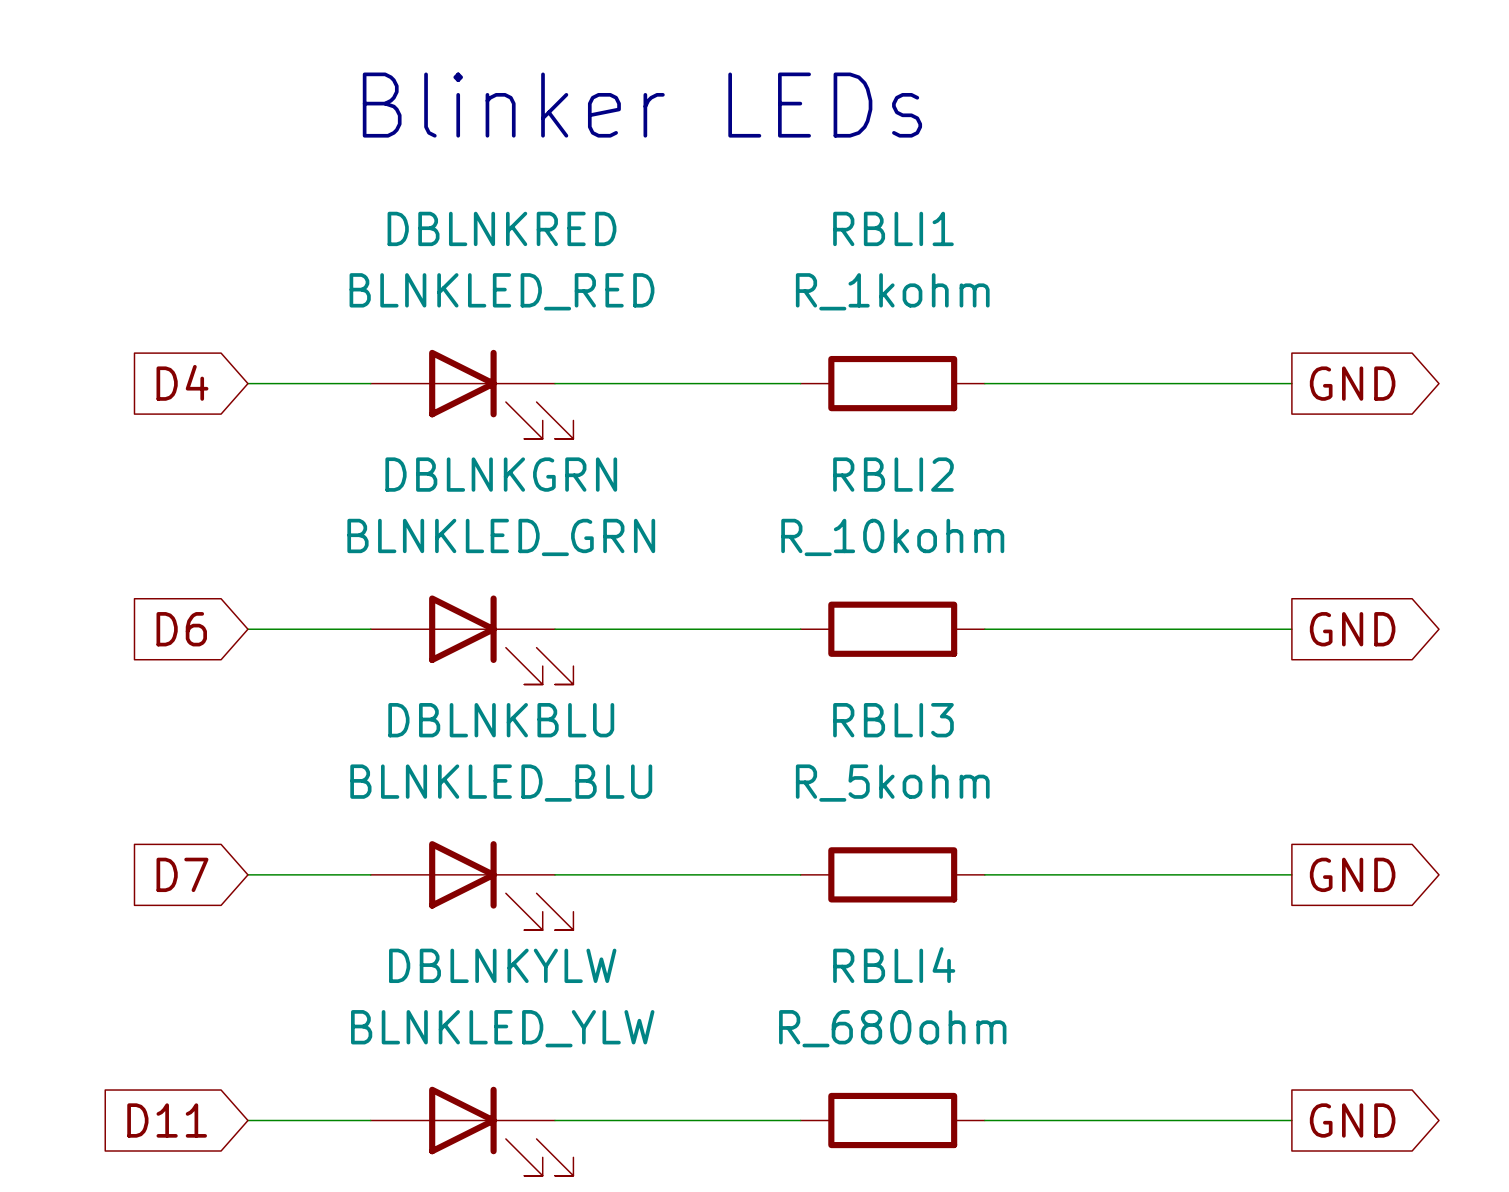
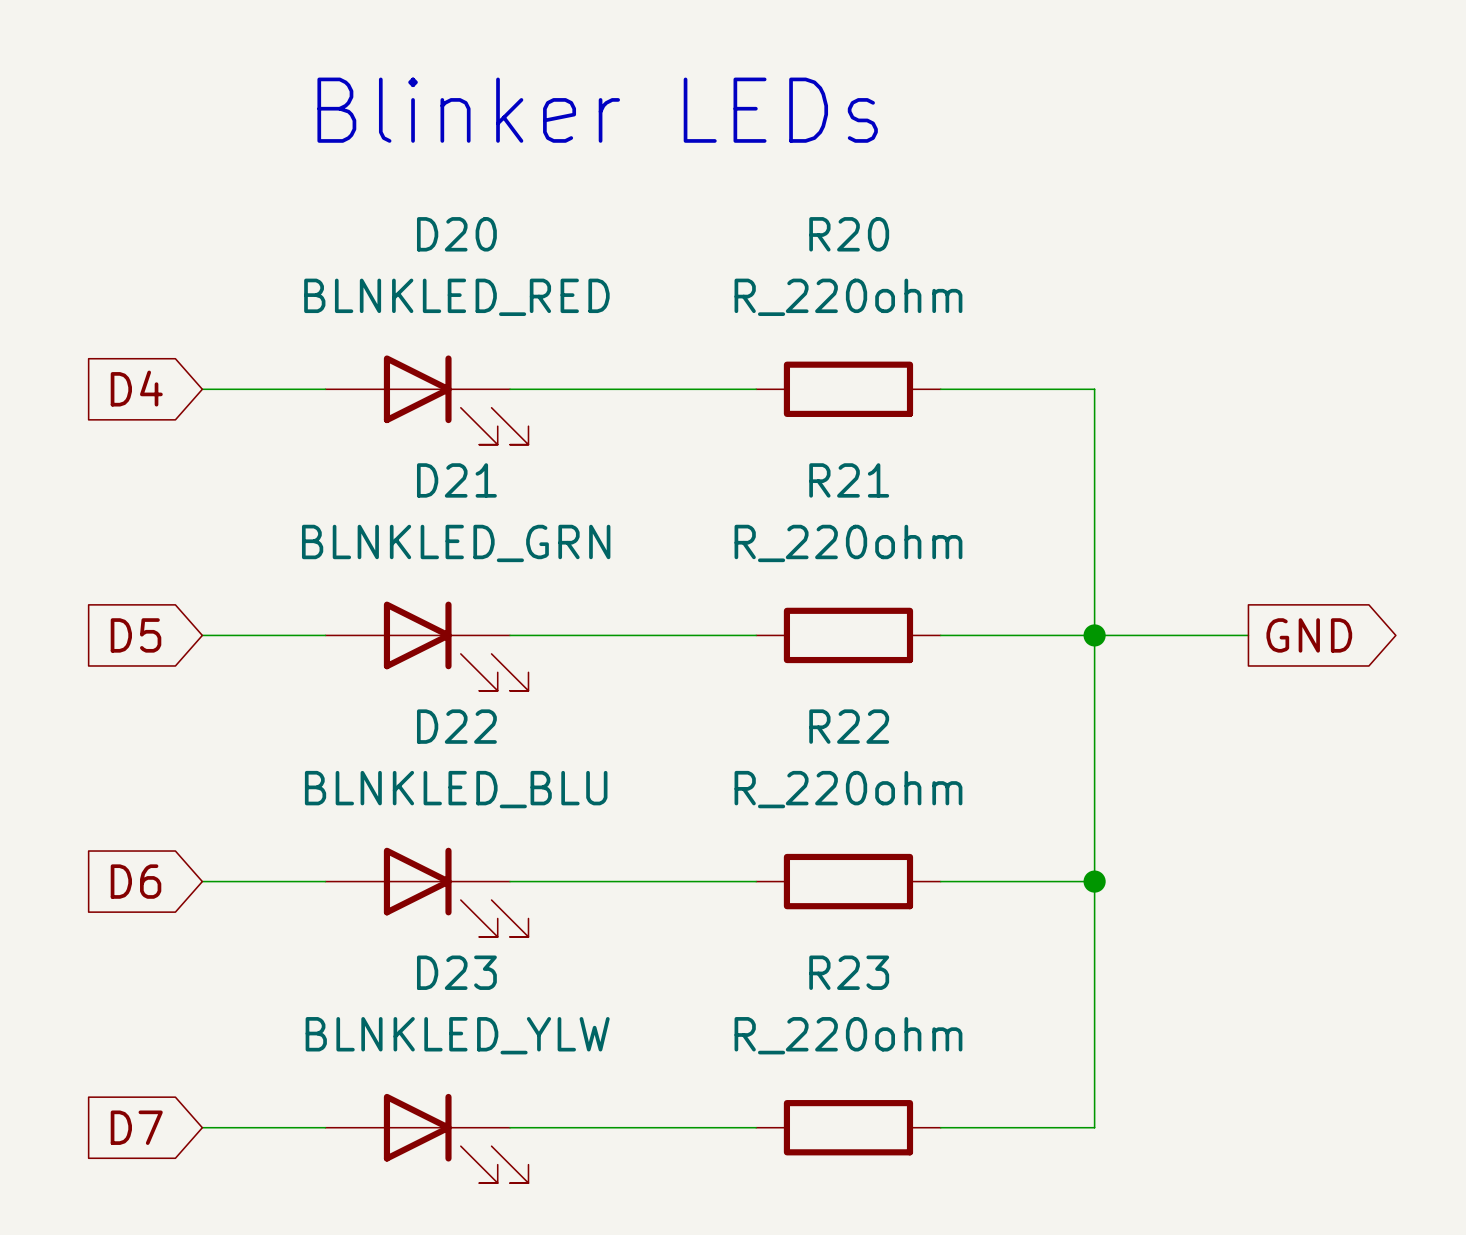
DBLNKRED name: DBLNKRED (501, 228) -> D20 (456, 234)
RBLI1 name: RBLI1 (893, 228) -> R20 (849, 234)
RBLI1 value: R_1kohm (892, 291) -> R_220ohm (848, 297)
wire: (1138, 383) (1291, 383) -> (1094, 389) (1094, 1127)
global label: GND (1352, 383) -> none
DBLNKGRN name: DBLNKGRN (501, 474) -> D21 (456, 480)
RBLI2 name: RBLI2 (893, 474) -> R21 (849, 480)
RBLI2 value: R_10kohm (892, 537) -> R_220ohm (848, 543)
global label: D6 (181, 629) -> D5 (136, 635)
junction: none -> (1094, 635)
DBLNKBLU name: DBLNKBLU (501, 720) -> D22 (456, 726)
RBLI3 name: RBLI3 (893, 720) -> R22 (849, 726)
RBLI3 value: R_5kohm (892, 783) -> R_220ohm (848, 789)
global label: D7 (182, 874) -> D6 (136, 881)
wire: (1138, 874) (1291, 874) -> none
junction: none -> (1094, 881)
global label: GND (1352, 874) -> none
DBLNKYLW name: DBLNKYLW (502, 965) -> D23 (456, 972)
RBLI4 name: RBLI4 (894, 965) -> R23 (849, 972)
RBLI4 value: R_680ohm (892, 1028) -> R_220ohm (848, 1035)
global label: D11 (167, 1120) -> D7 (136, 1127)
wire: (1138, 1120) (1291, 1120) -> none
global label: GND (1352, 1120) -> none

